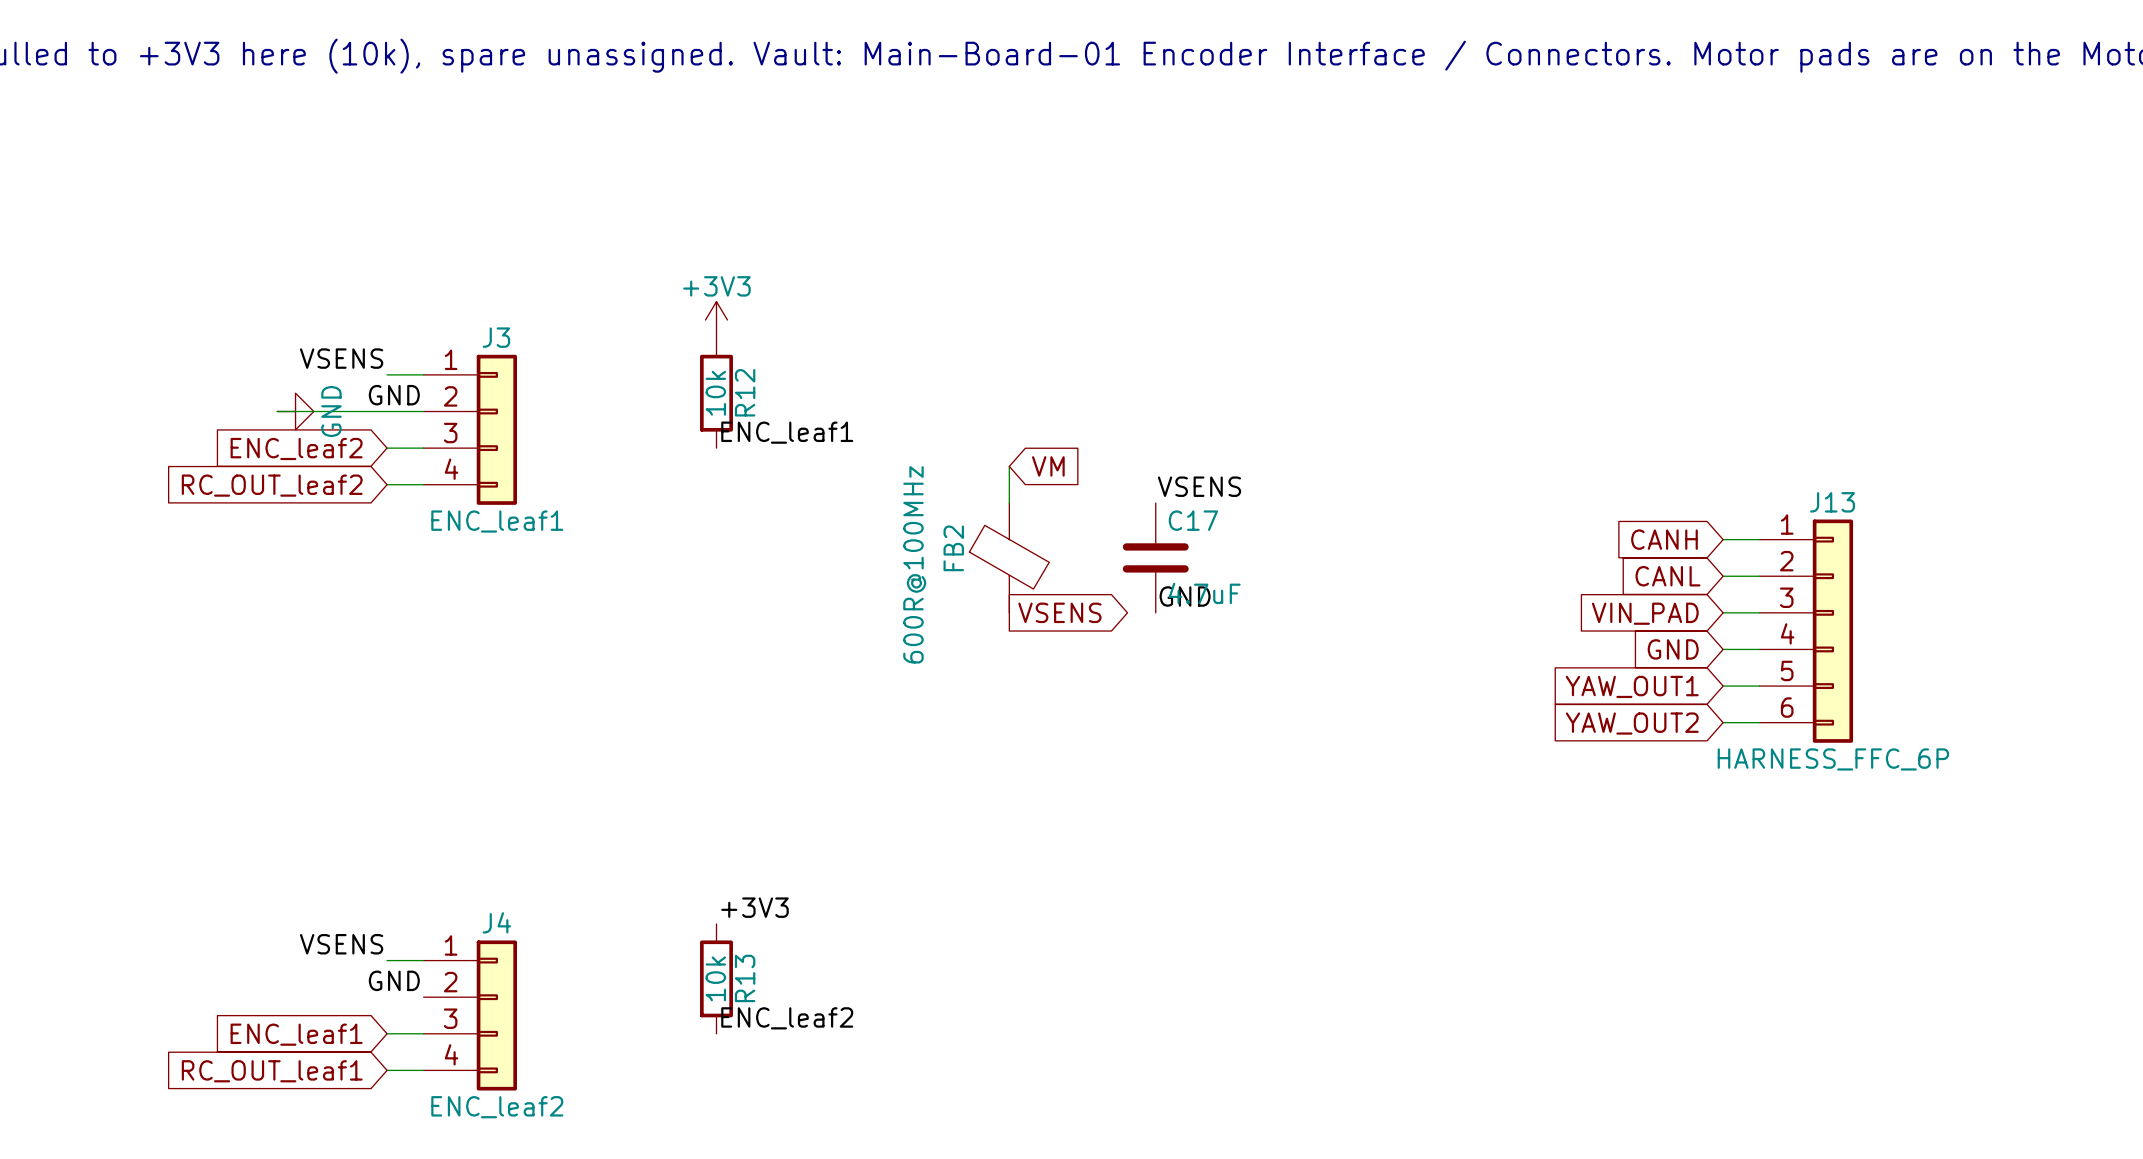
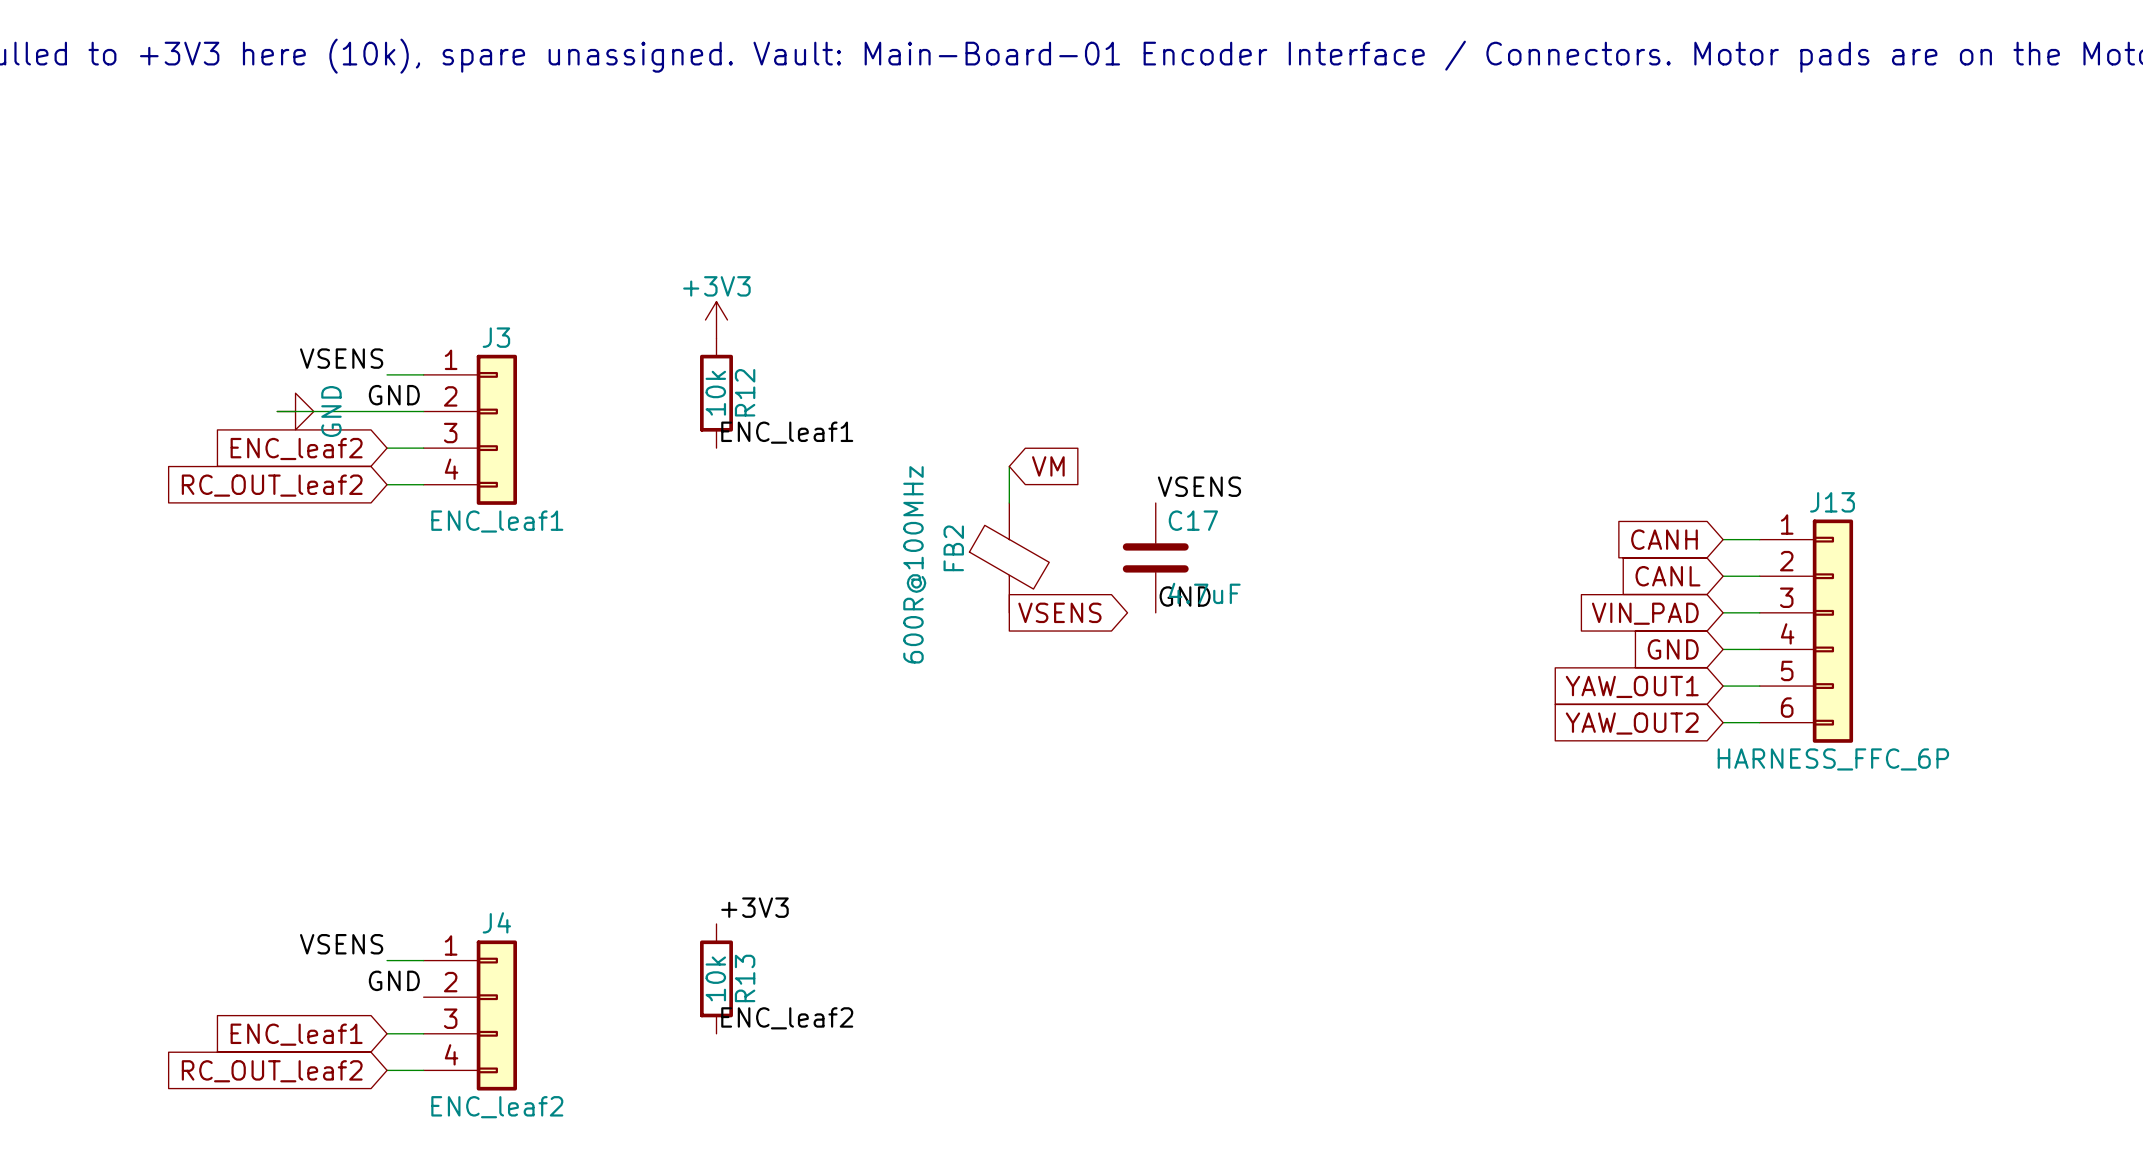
global label: RC_OUT_leaf1 (272, 1071) -> RC_OUT_leaf2 (272, 1071)

